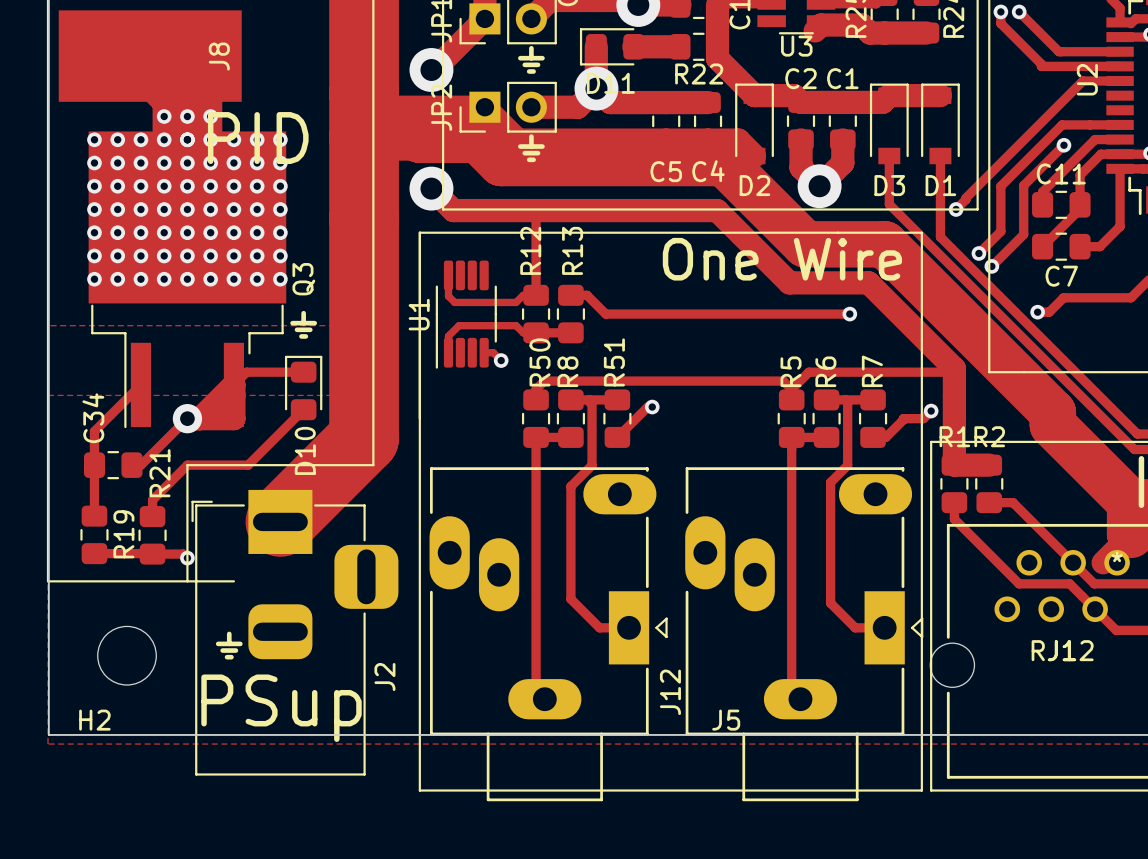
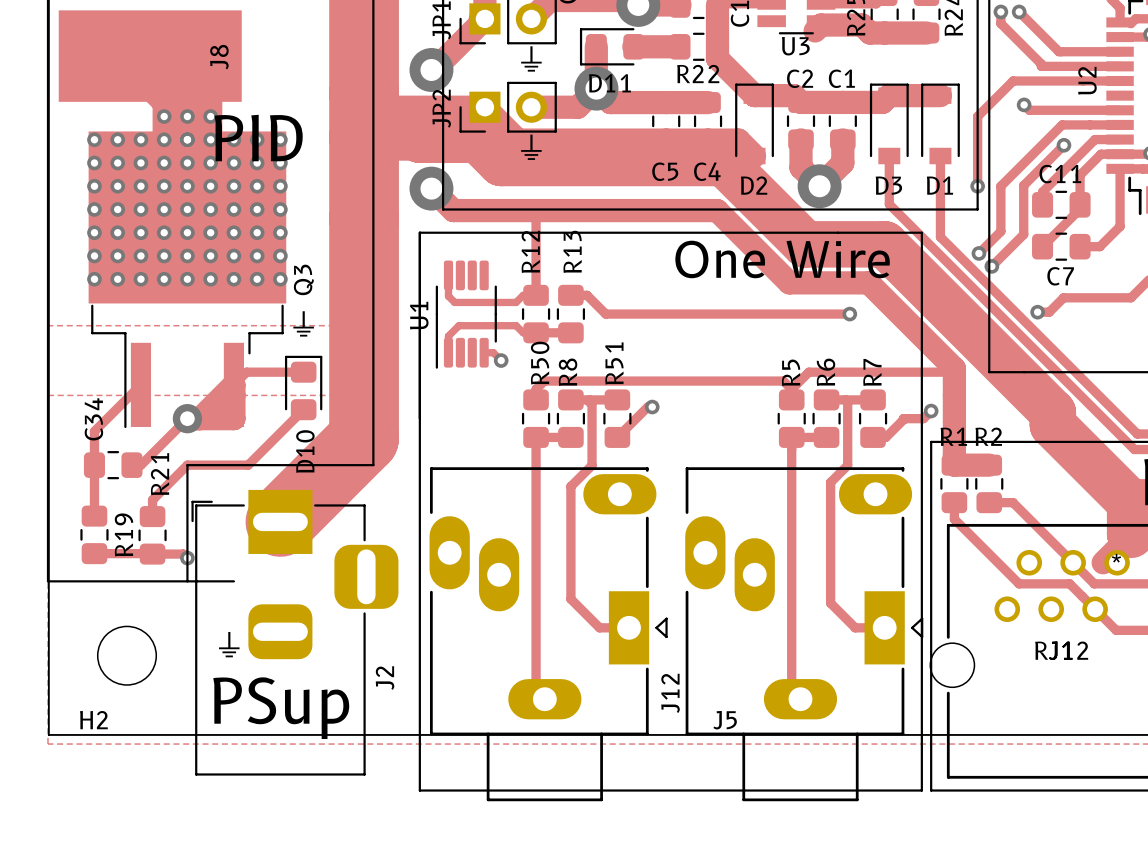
track: (1082, 81) (956, 209) -> (1082, 81) (1013, 81) (977, 116) (977, 186)
track: none -> (1024, 104) (1029, 110) (1120, 110)
via: none -> (1024, 104)
via position: (956, 209) -> (977, 186)

